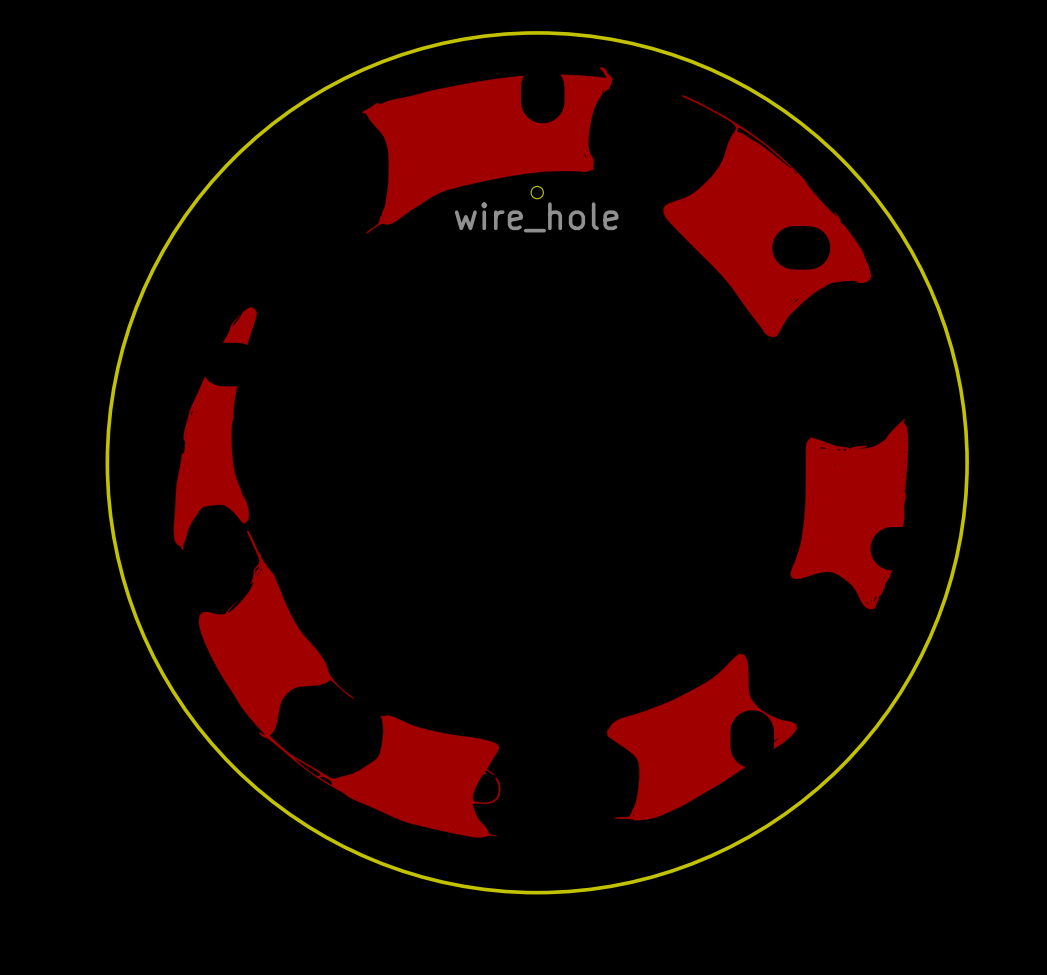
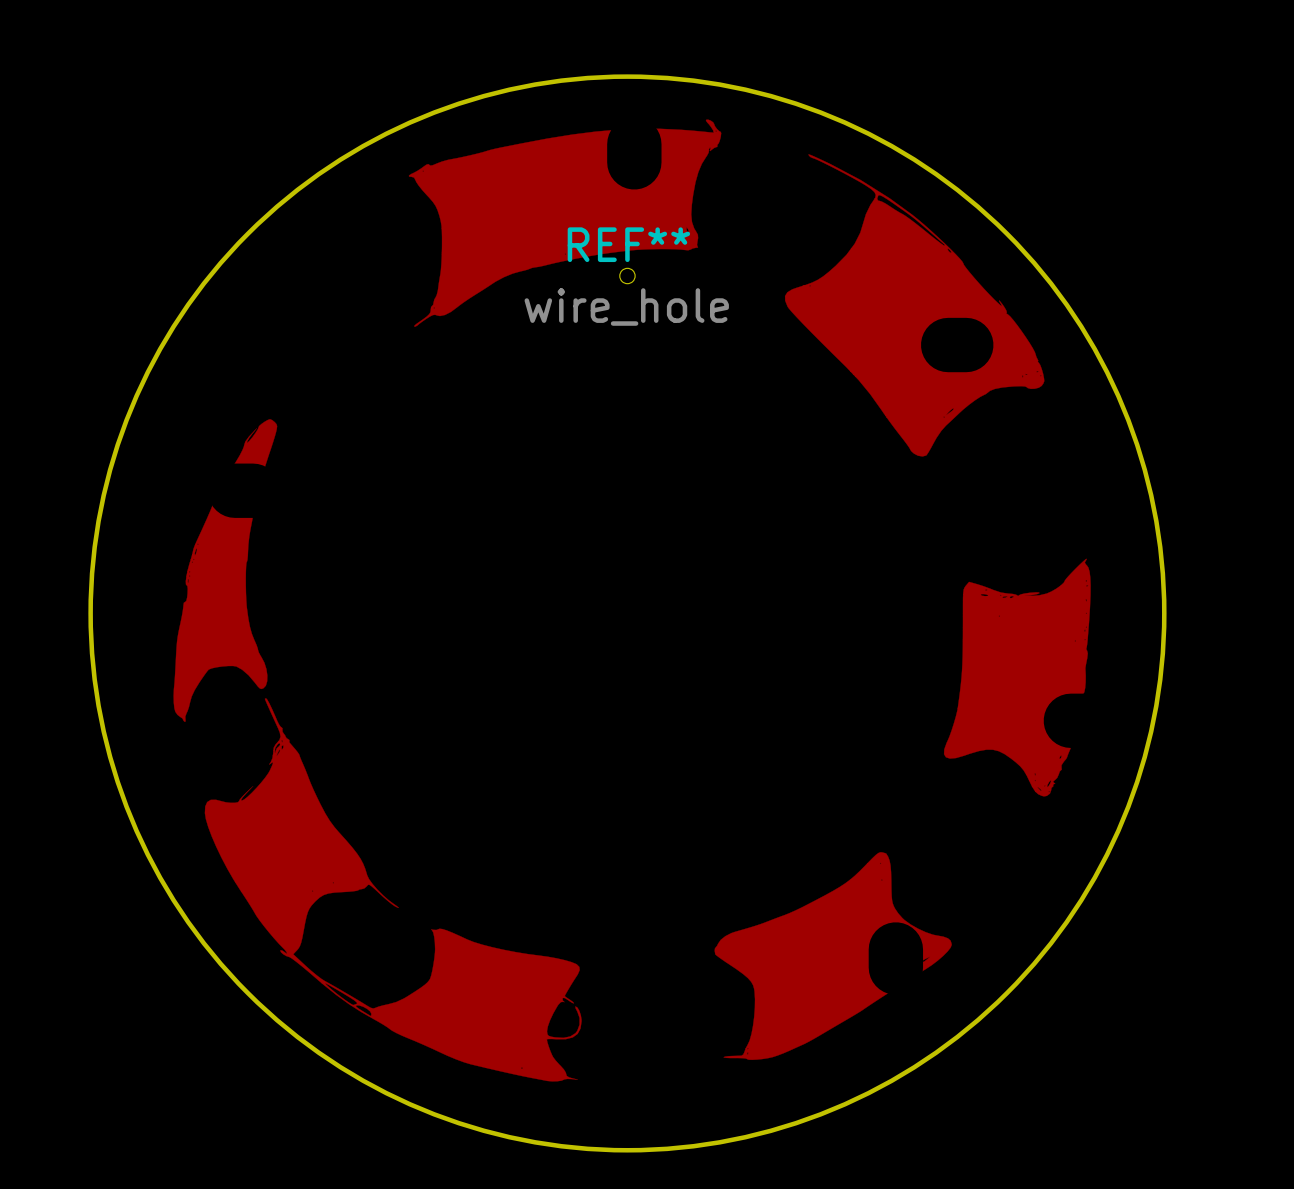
REF** name: none -> REF** (628, 244)

